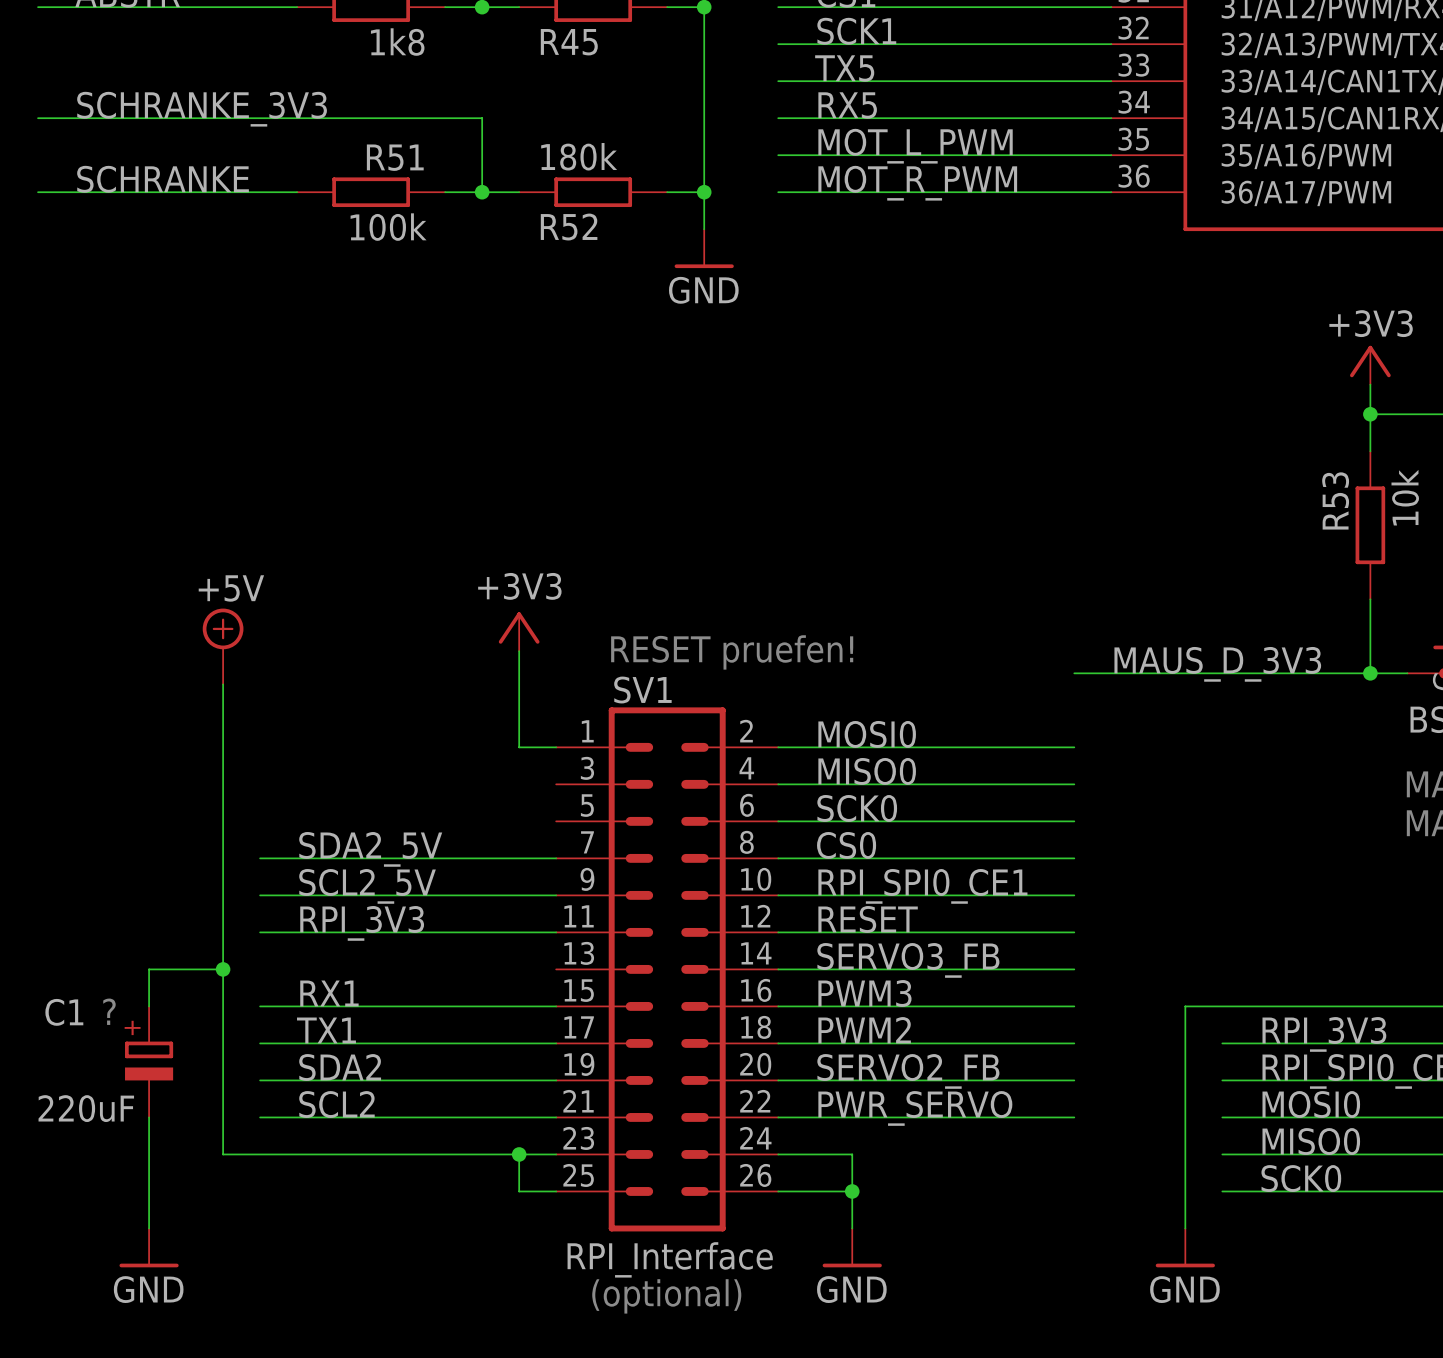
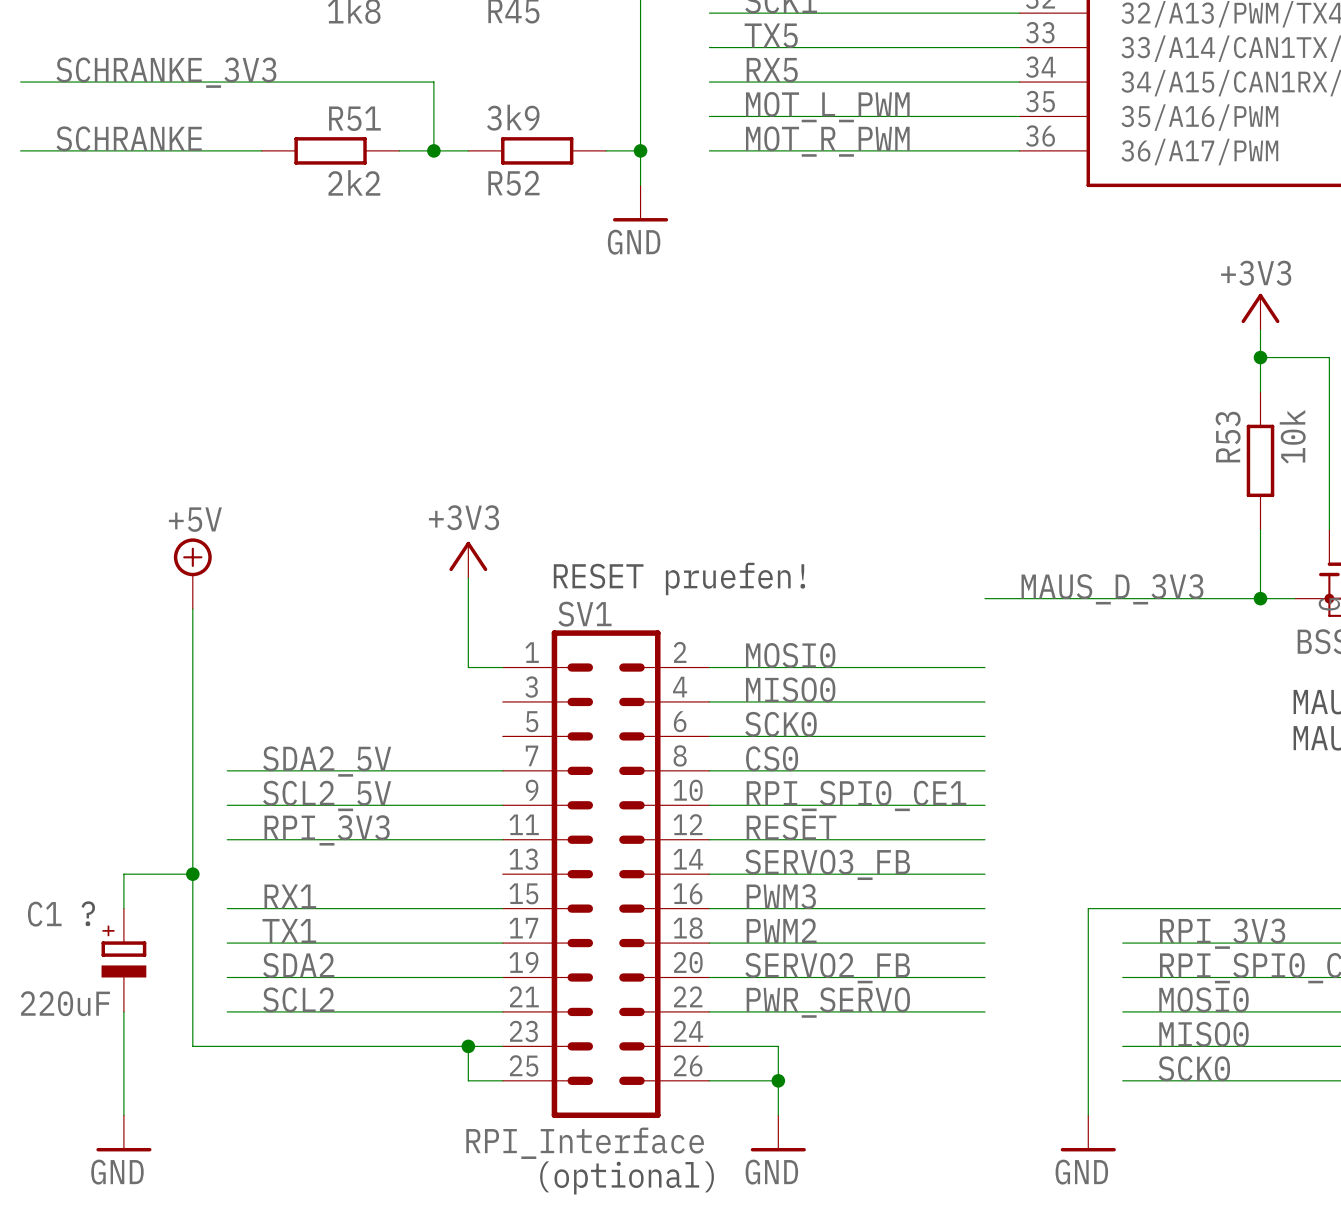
R52 value: 180k (579, 156) -> 3k9 (513, 117)
R51 value: 100k (388, 227) -> 2k2 (354, 182)

